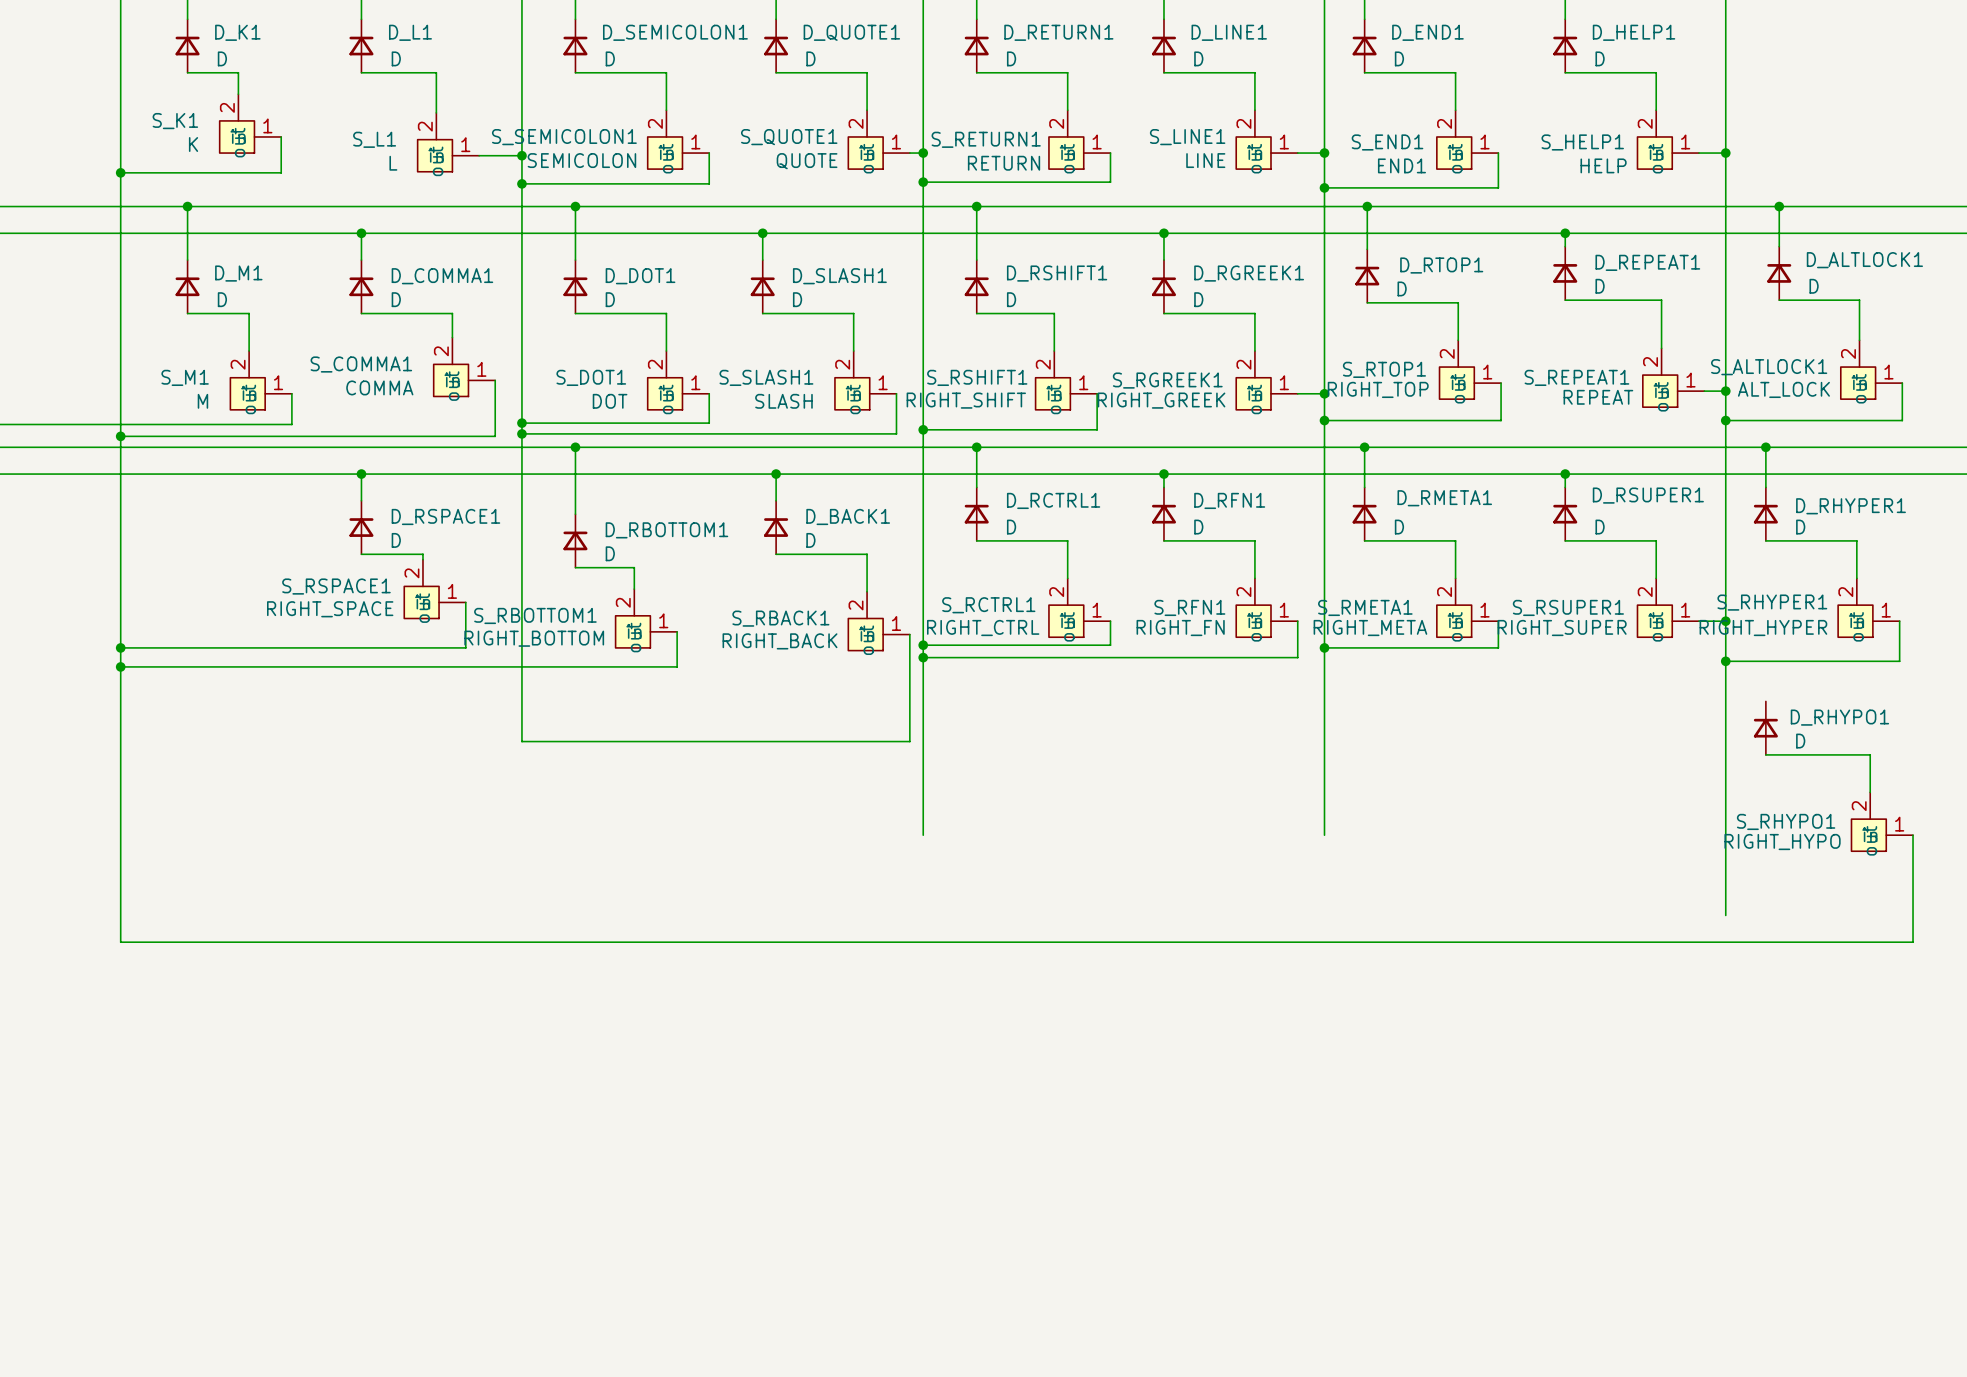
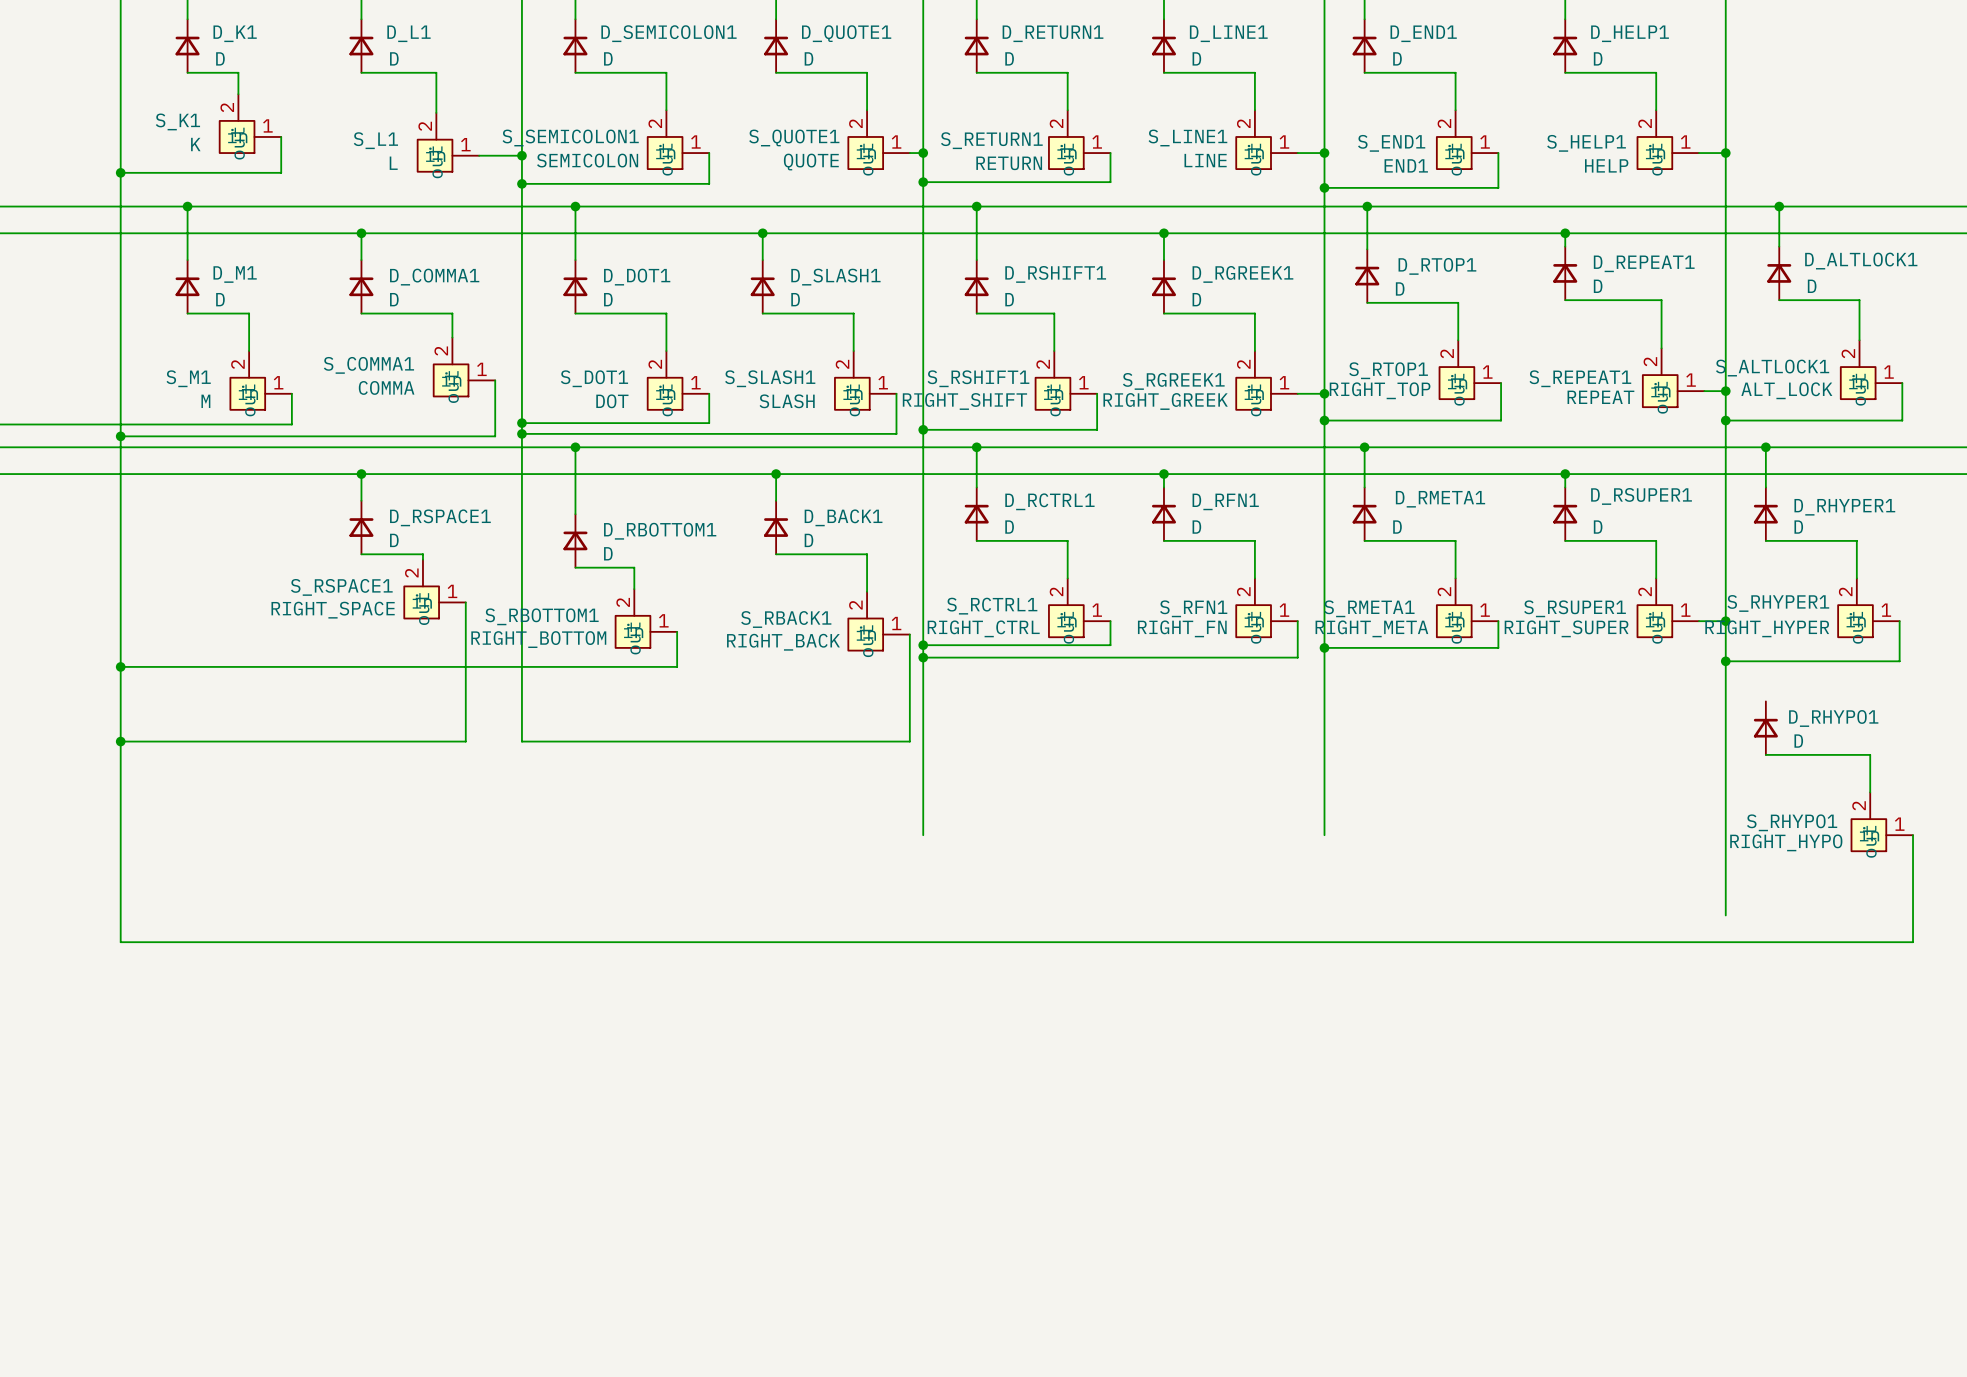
wire: (120, 647) (465, 647) -> (120, 741) (465, 741) (465, 647)
junction: (120, 647) -> none
junction: none -> (120, 741)

